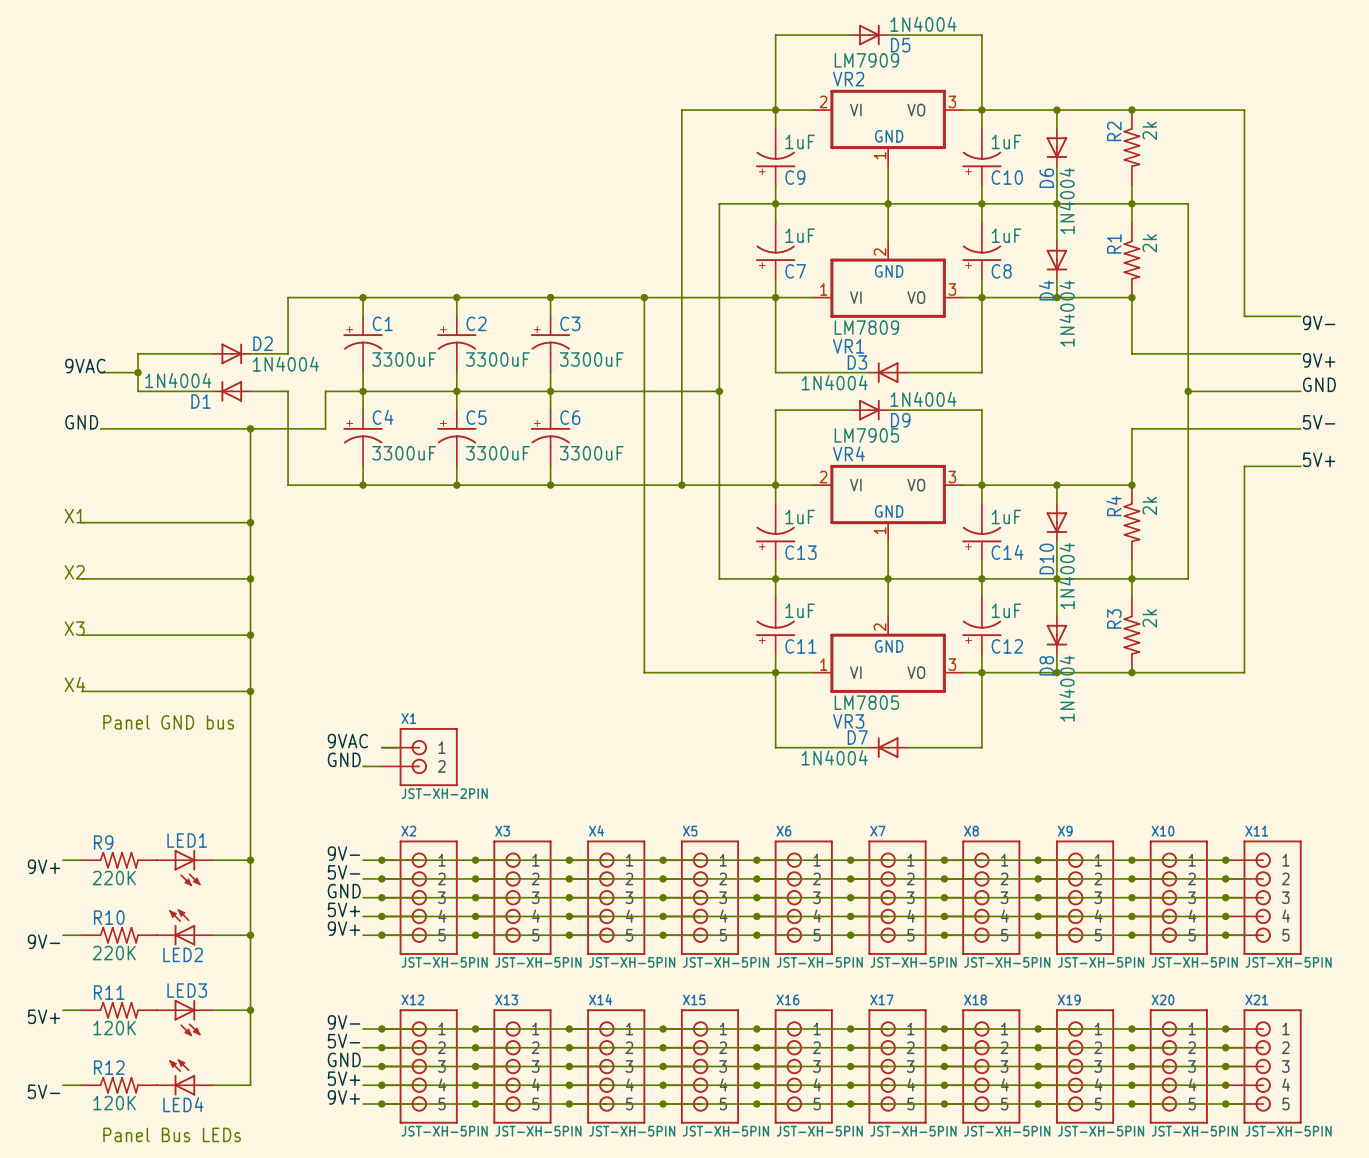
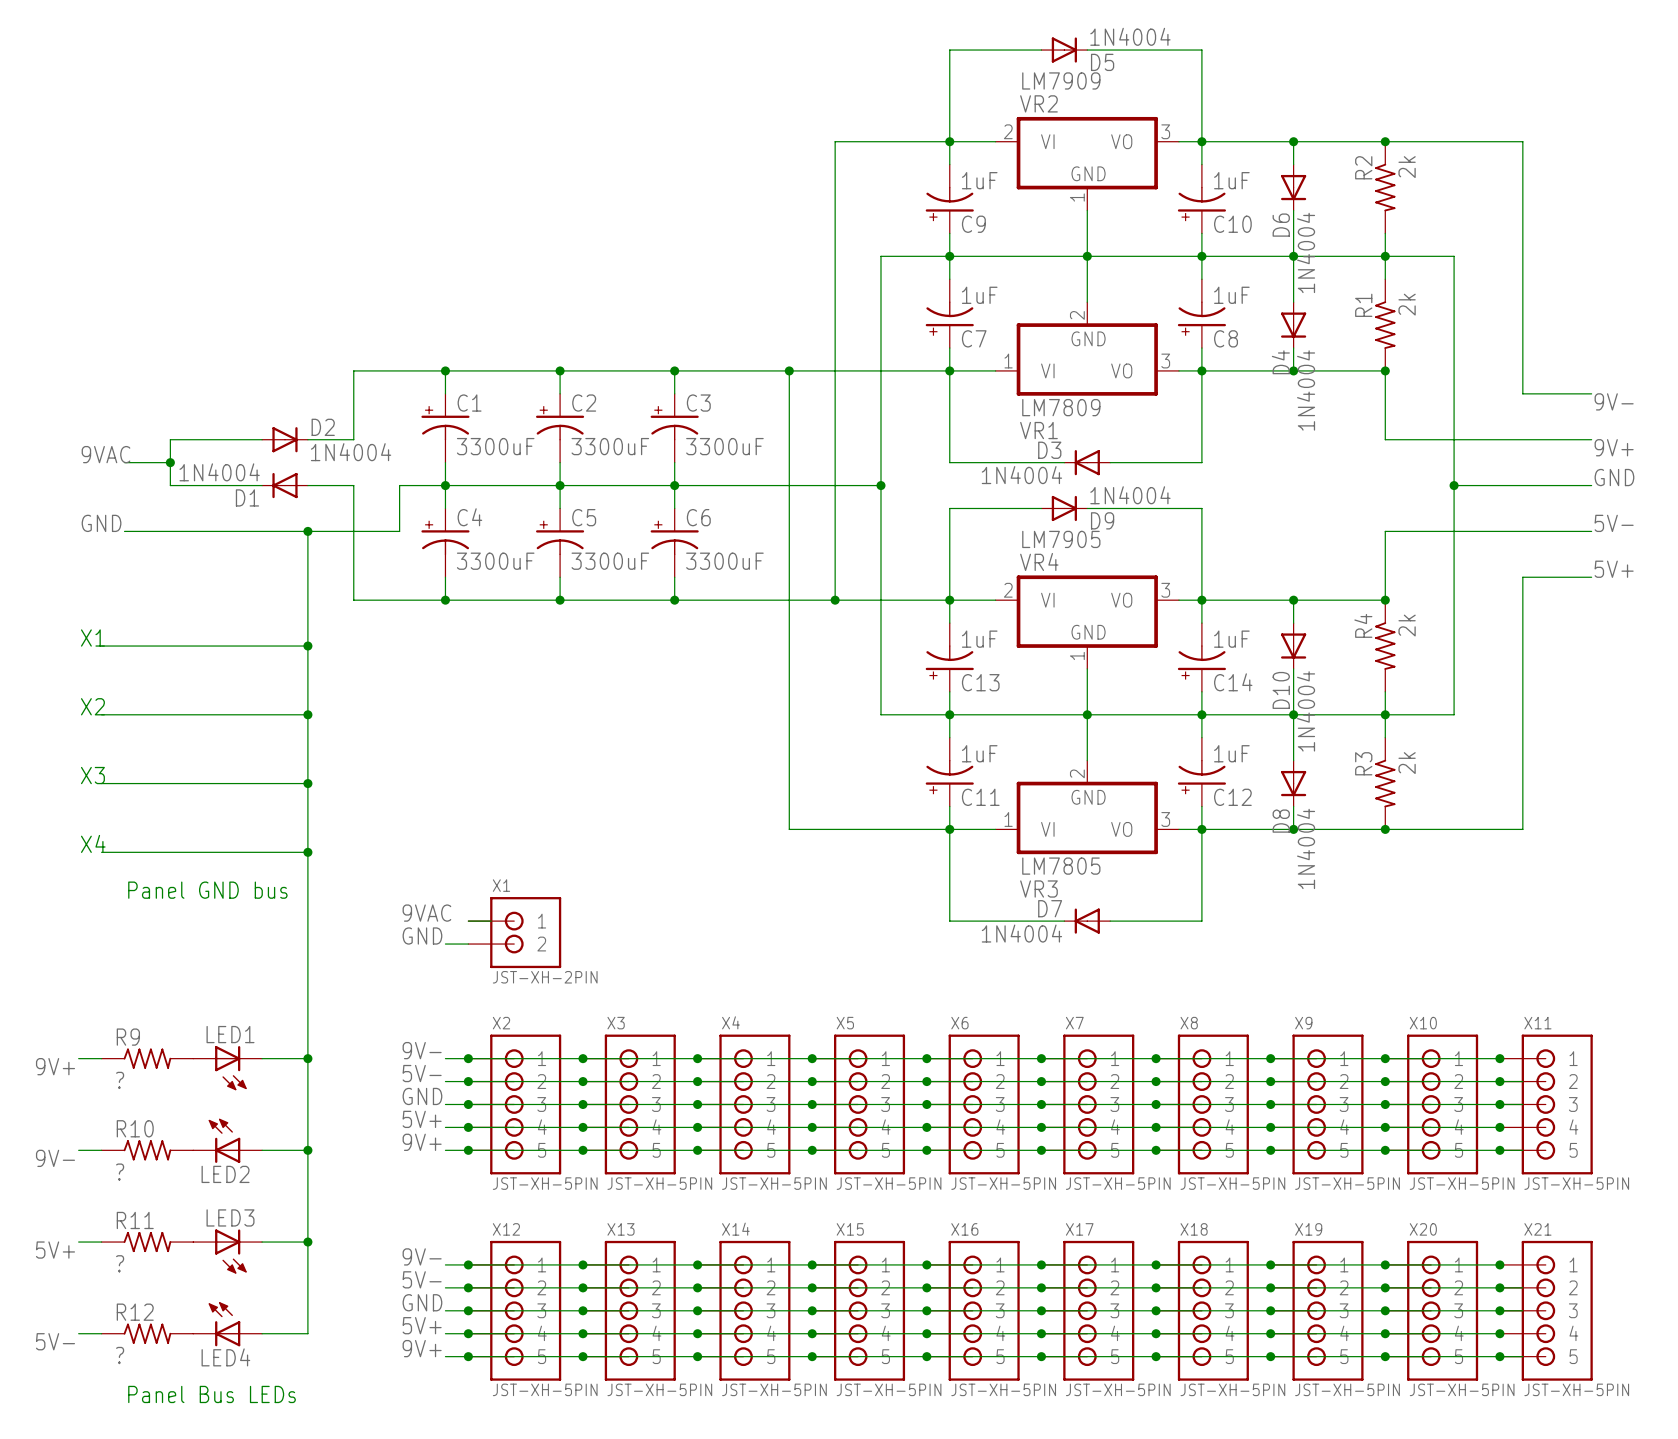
R9 value: 220K (114, 878) -> ? (120, 1080)
R10 value: 220K (114, 953) -> ? (120, 1172)
R11 value: 120K (114, 1028) -> ? (120, 1263)
R12 value: 120K (114, 1103) -> ? (120, 1355)

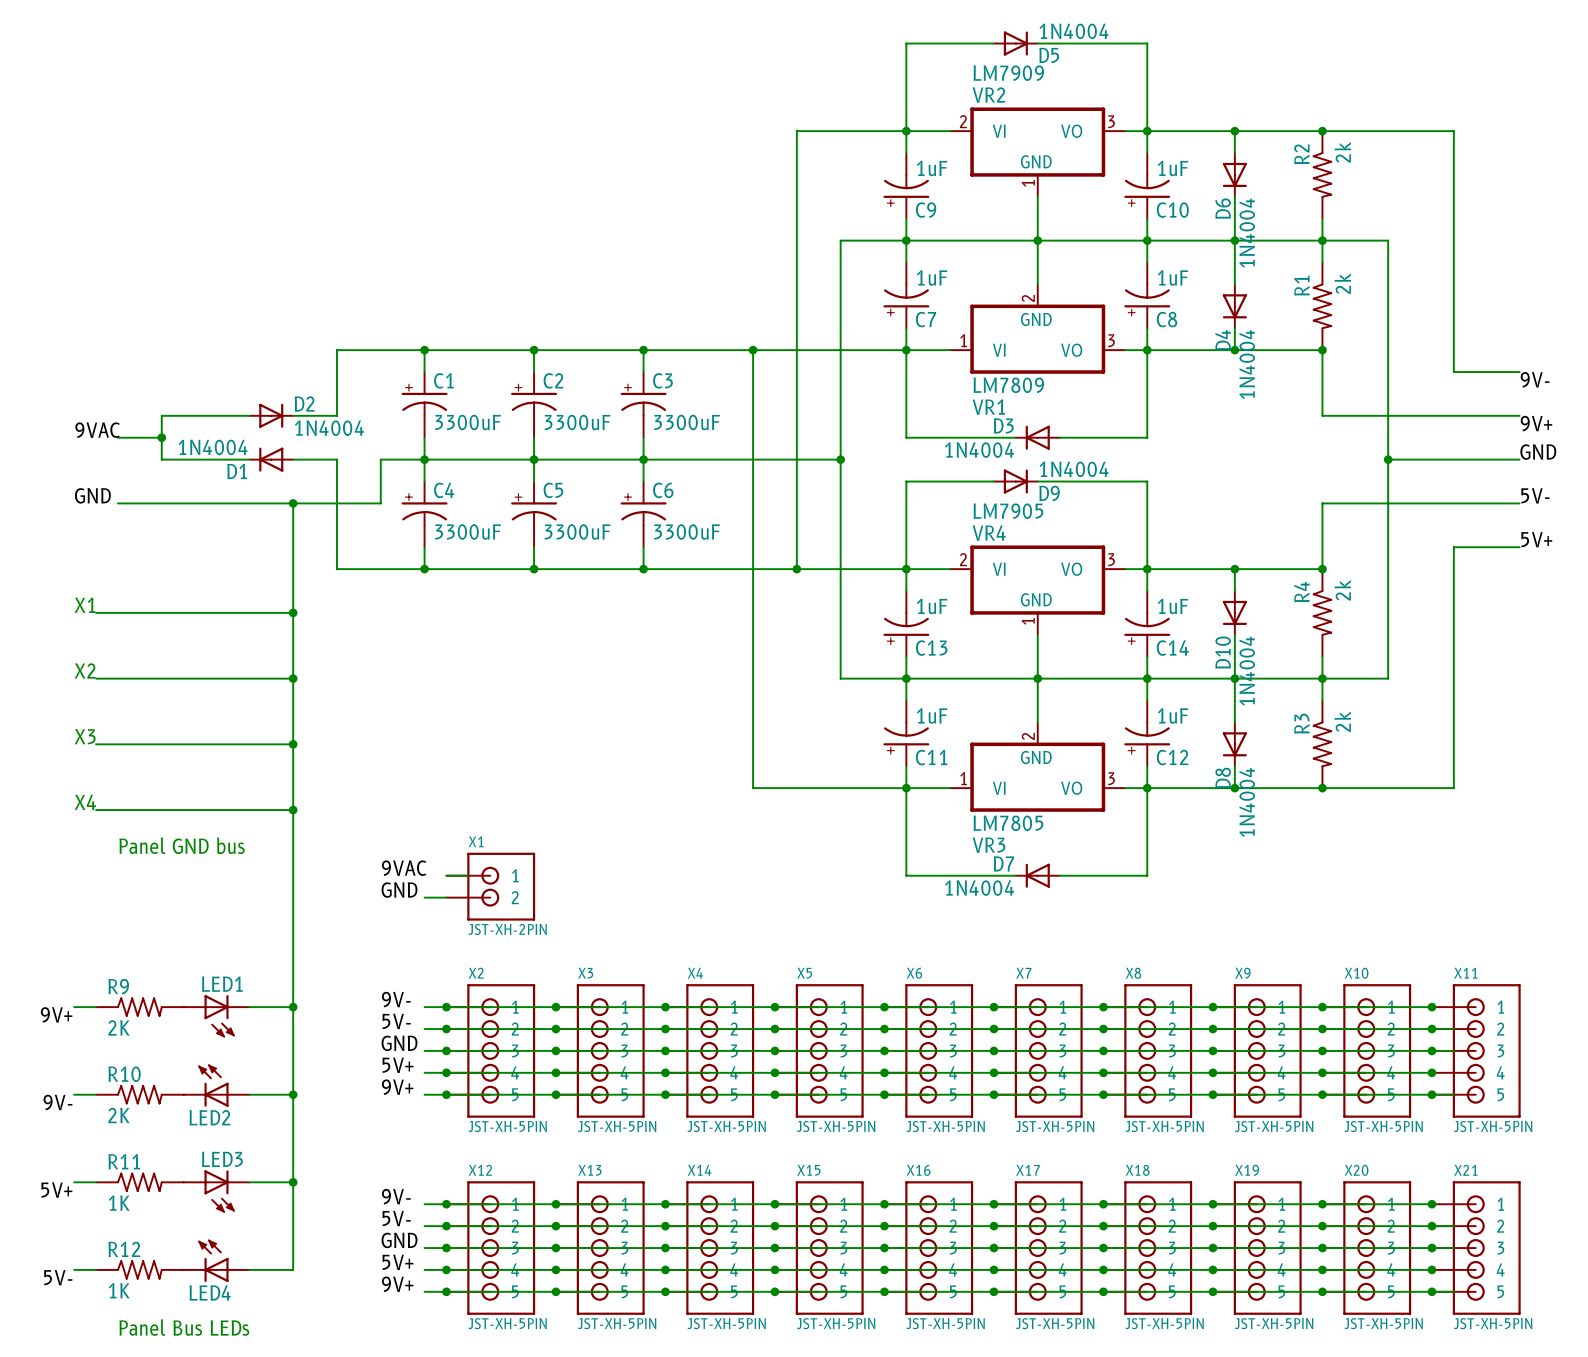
R9 value: ? (120, 1080) -> 2K (119, 1027)
R10 value: ? (120, 1172) -> 2K (119, 1115)
R11 value: ? (120, 1263) -> 1K (119, 1203)
R12 value: ? (120, 1355) -> 1K (119, 1290)

